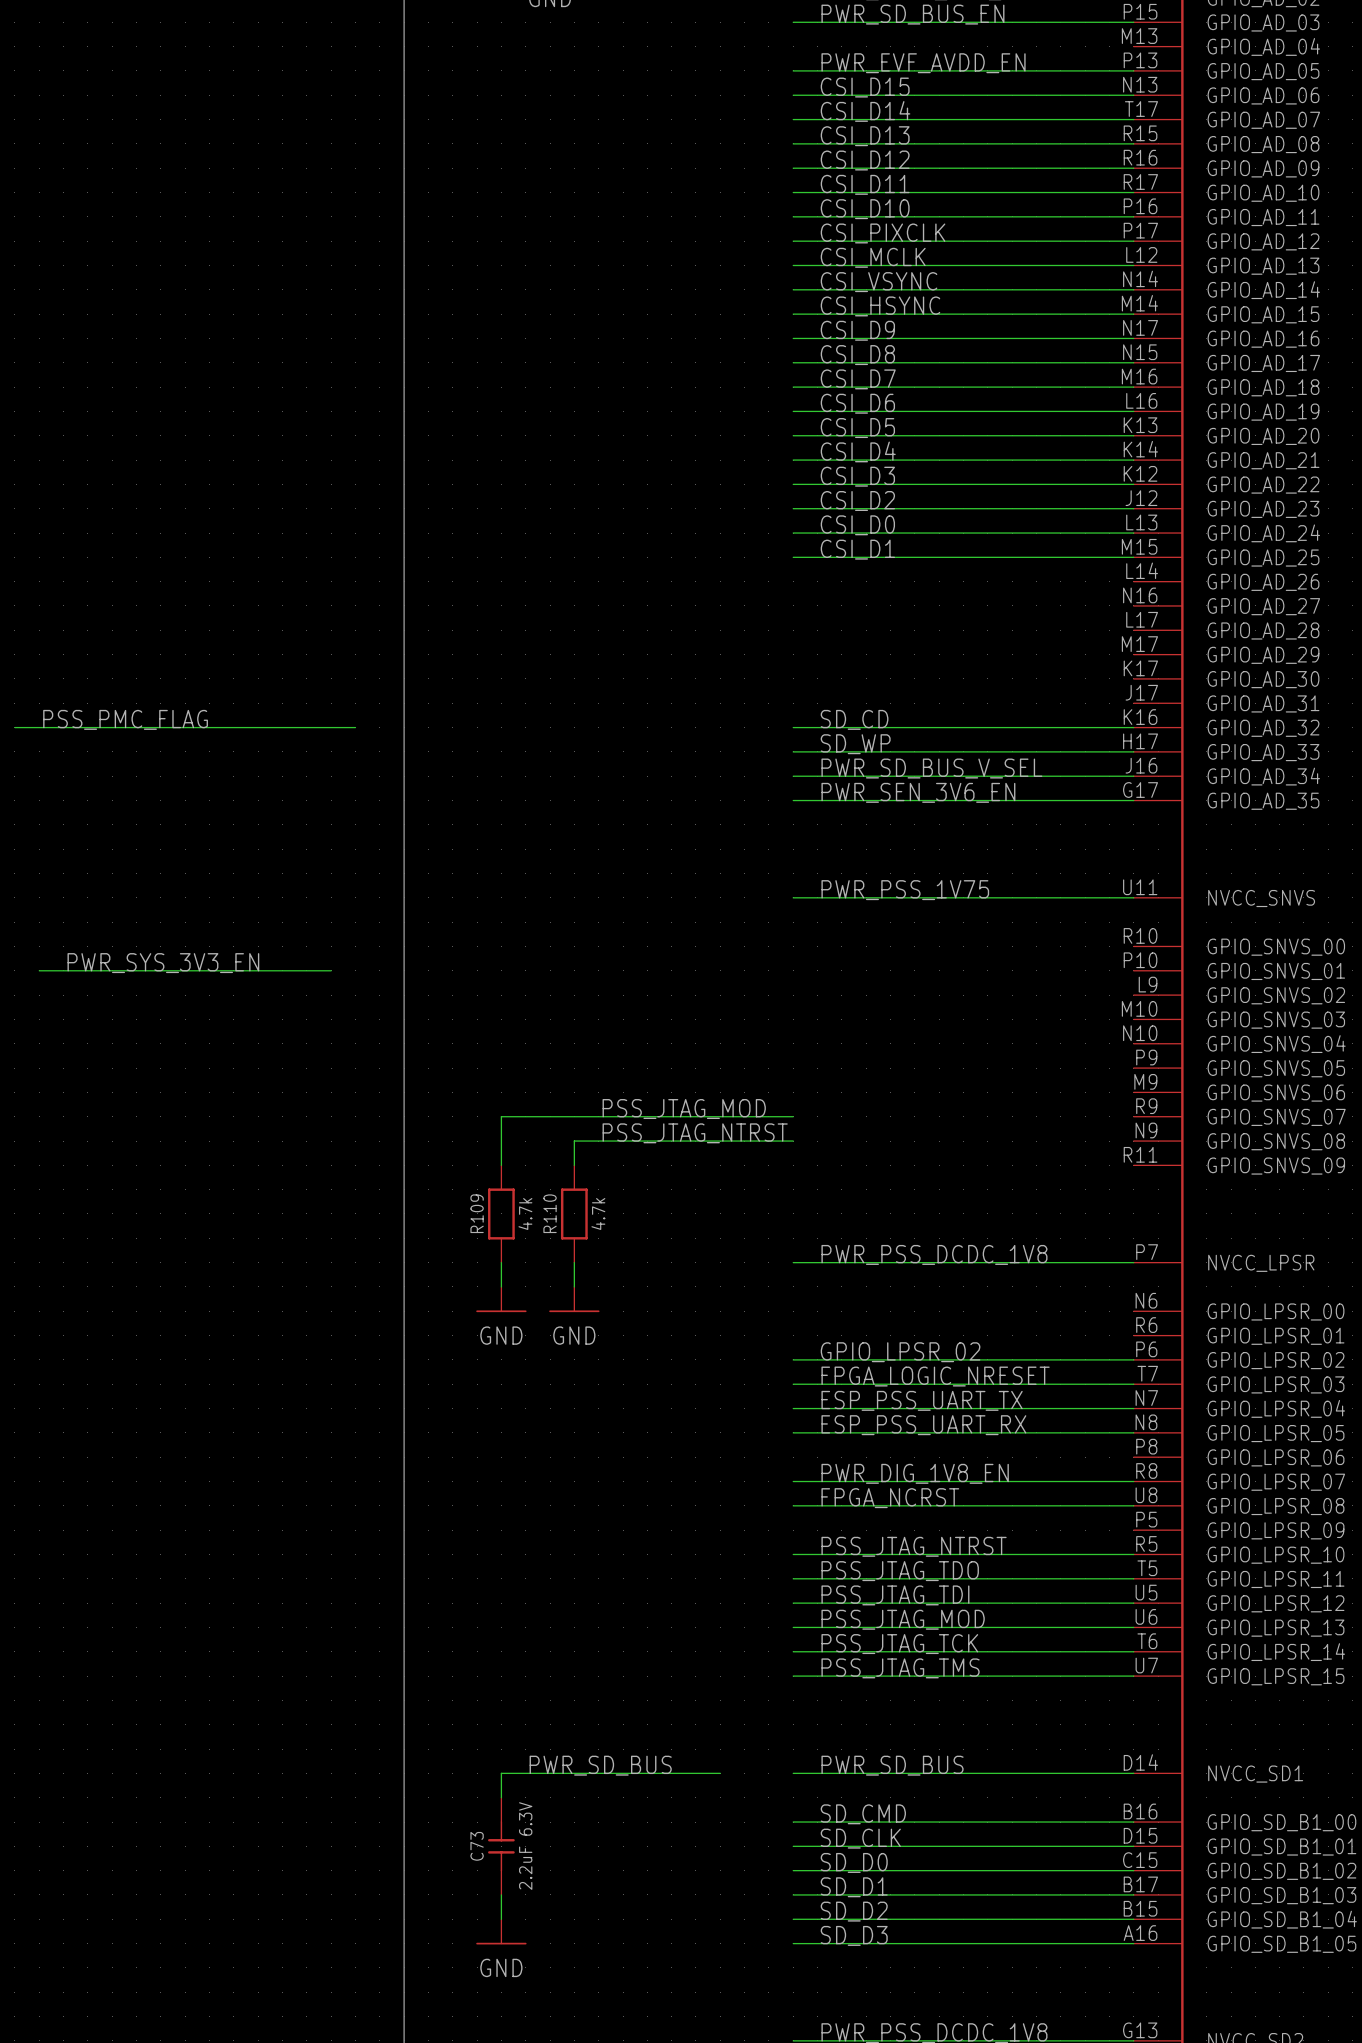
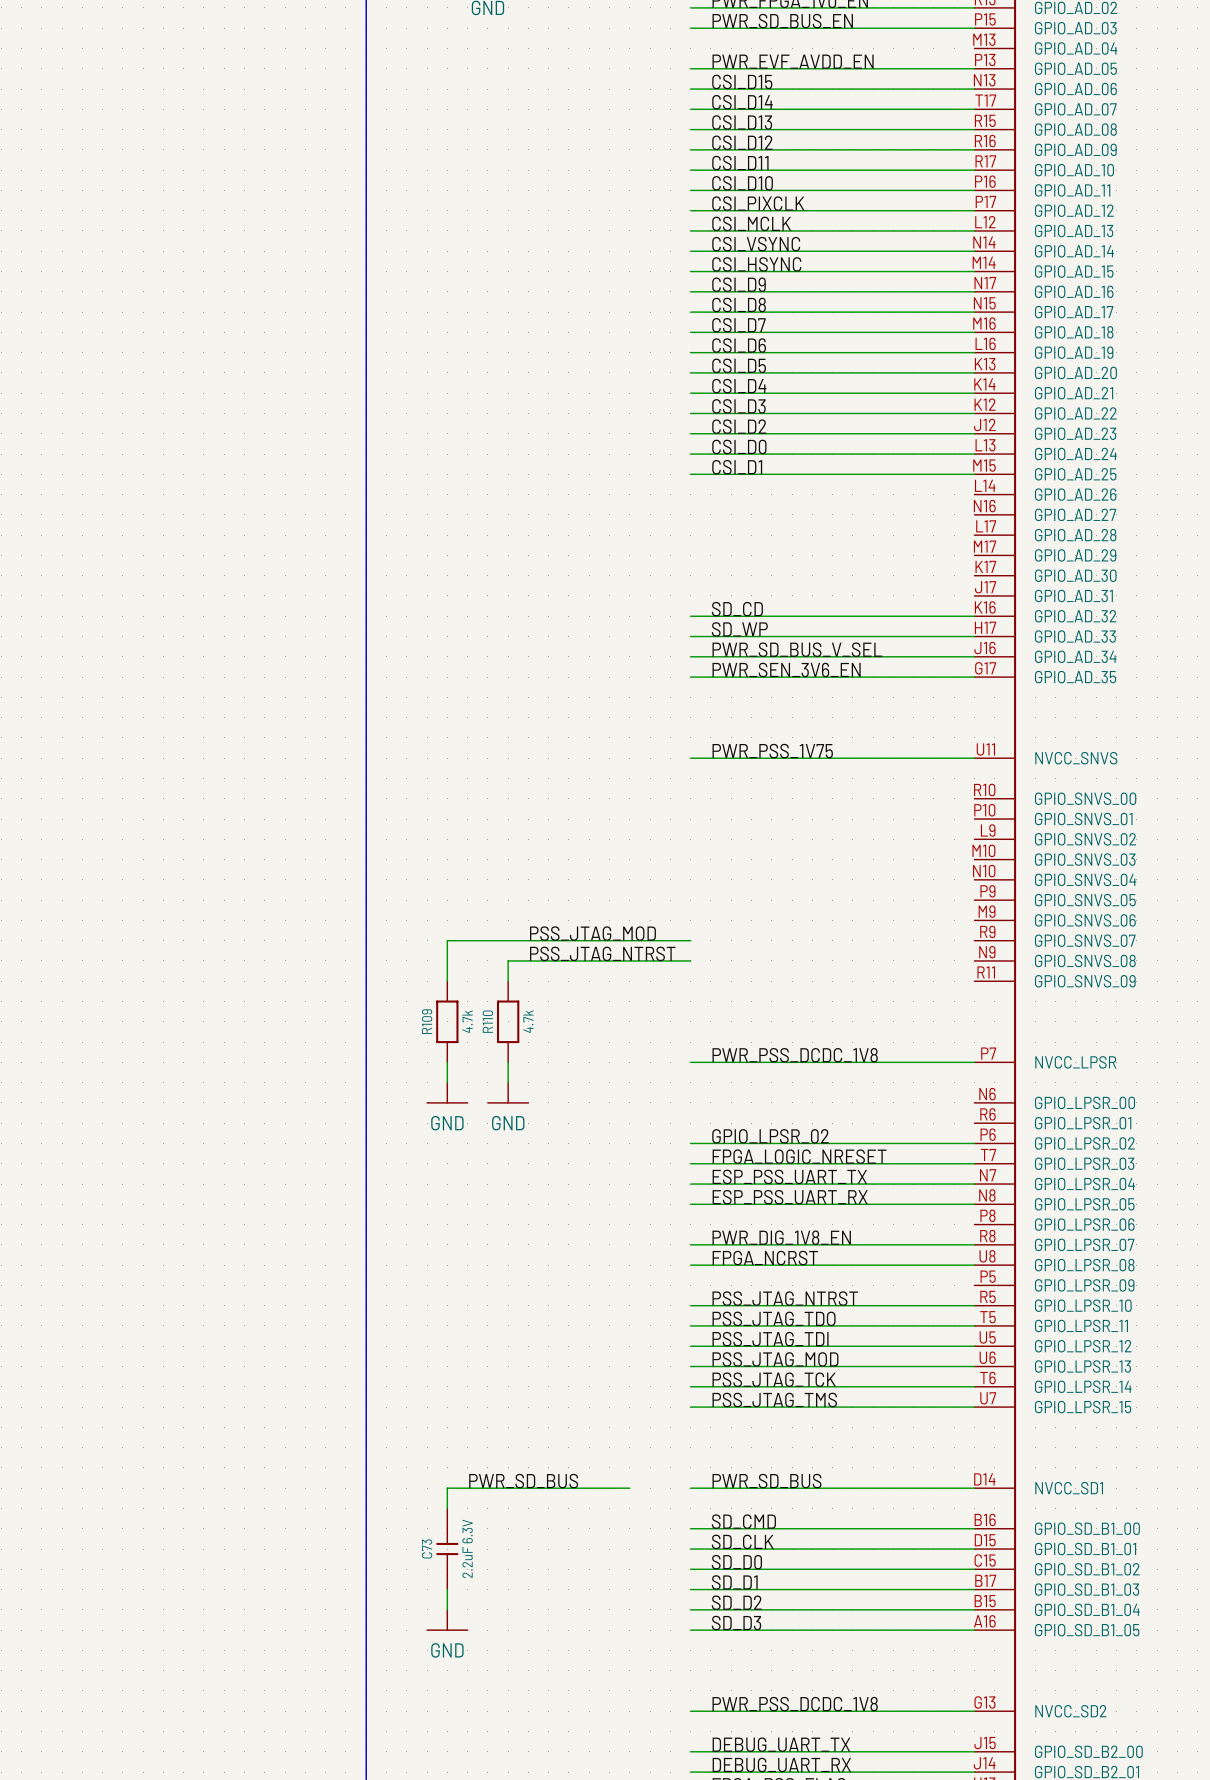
label: PSS_PMC_FLAG (125, 719) -> none
wire: (14, 727) (355, 727) -> none
label: PWR_SYS_3V3_EN (163, 963) -> none
wire: (39, 970) (331, 970) -> none

